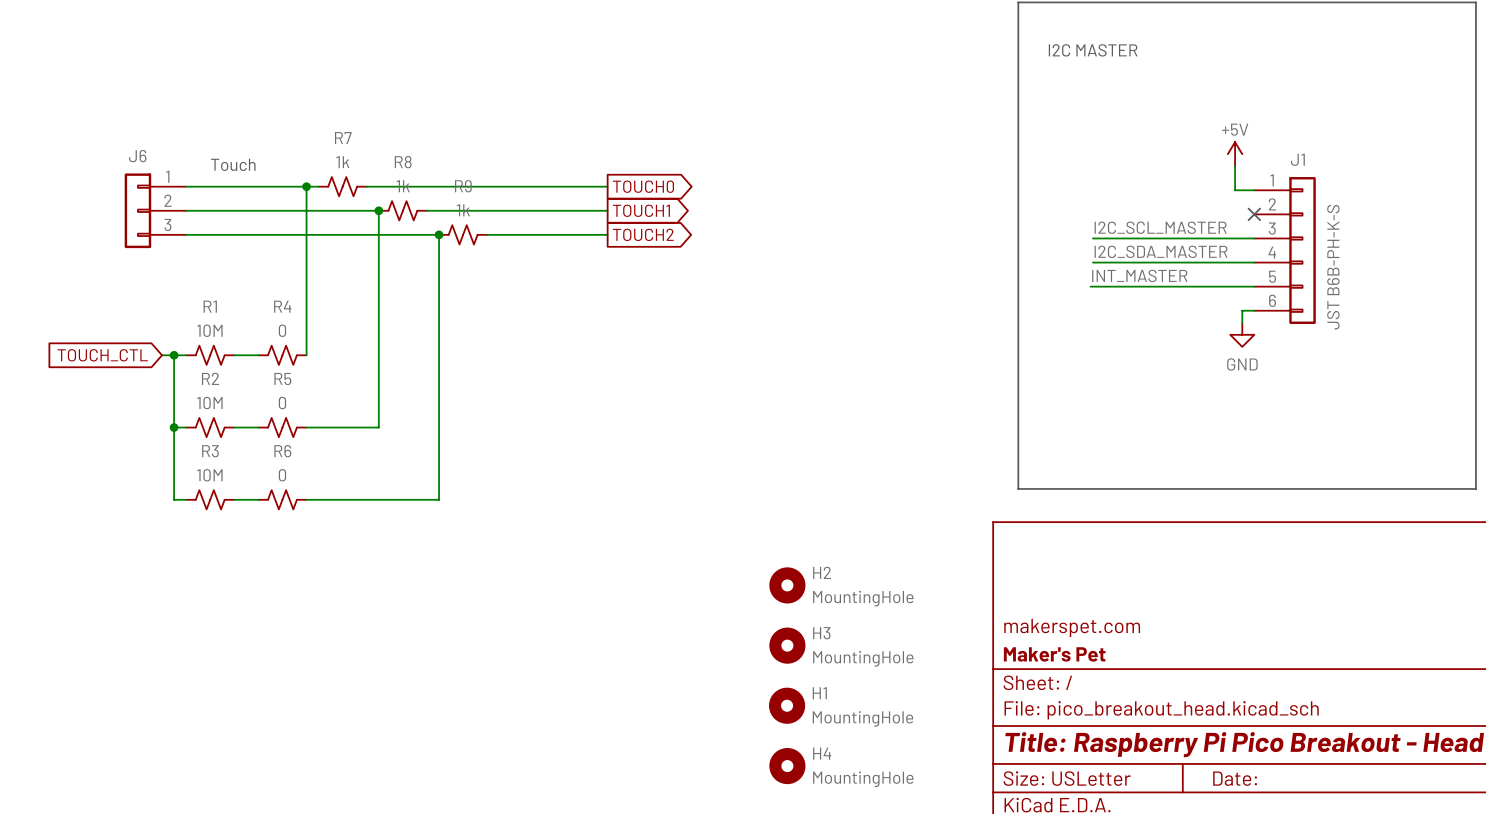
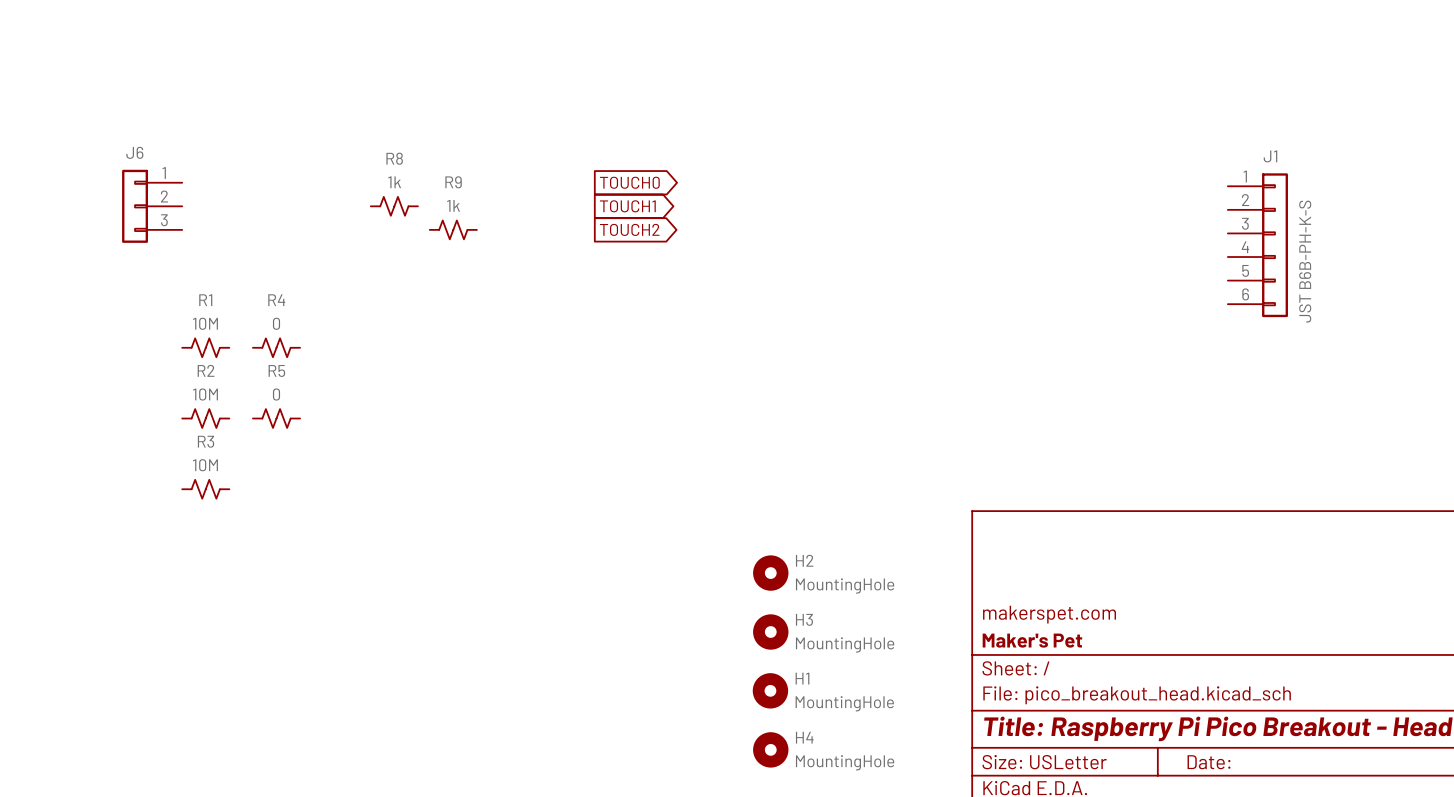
line: (1018, 2) (1475, 2) (1475, 488) (1018, 488) (1018, 2) -> none
text: I2C MASTER (1093, 50) -> none
power symbol: +5V (1235, 154) -> none
text: Touch (233, 164) -> none
wire: (1235, 166) (1235, 190) (1254, 190) -> none
wire: (186, 186) (318, 186) -> none
wire: (306, 186) (306, 355) -> none
junction: (306, 186) -> none
R7: 1k (342, 186) -> none
wire: (366, 186) (607, 186) -> none
wire: (186, 210) (378, 210) (378, 427) (306, 427) -> none
junction: (378, 210) -> none
wire: (426, 210) (607, 210) -> none
no-connect mark: (1254, 214) -> none
label: I2C_SCL_MASTER (1160, 227) -> none
wire: (186, 234) (439, 234) (439, 499) (306, 499) -> none
junction: (439, 234) -> none
wire: (487, 234) (607, 234) -> none
wire: (1092, 238) (1254, 238) -> none
label: I2C_SDA_MASTER (1161, 251) -> none
wire: (1092, 262) (1254, 262) -> none
label: INT_MASTER (1139, 275) -> none
wire: (1090, 286) (1254, 286) -> none
wire: (1254, 310) (1242, 310) (1242, 322) -> none
power symbol: GND (1242, 334) -> none
global label: TOUCH_CTL (102, 355) -> none
wire: (162, 355) (186, 355) -> none
wire: (174, 355) (174, 499) (186, 499) -> none
junction: (174, 355) -> none
wire: (234, 355) (258, 355) -> none
wire: (174, 427) (186, 427) -> none
junction: (174, 427) -> none
wire: (234, 427) (258, 427) -> none
wire: (234, 499) (258, 499) -> none
R6: 0 (282, 499) -> none

